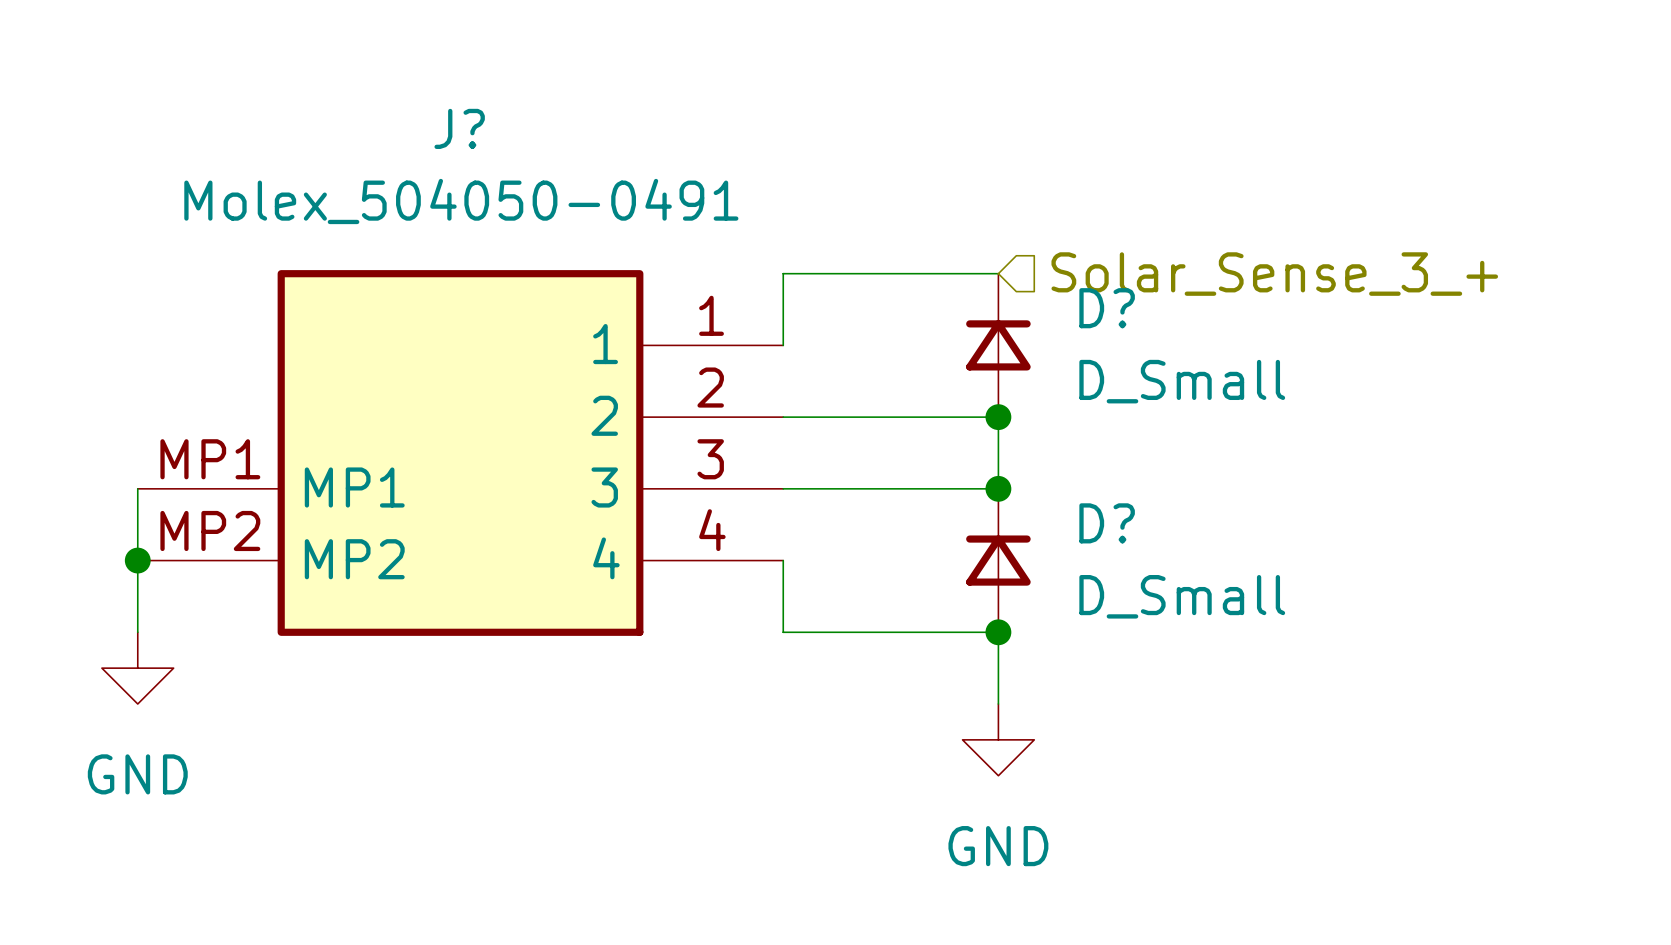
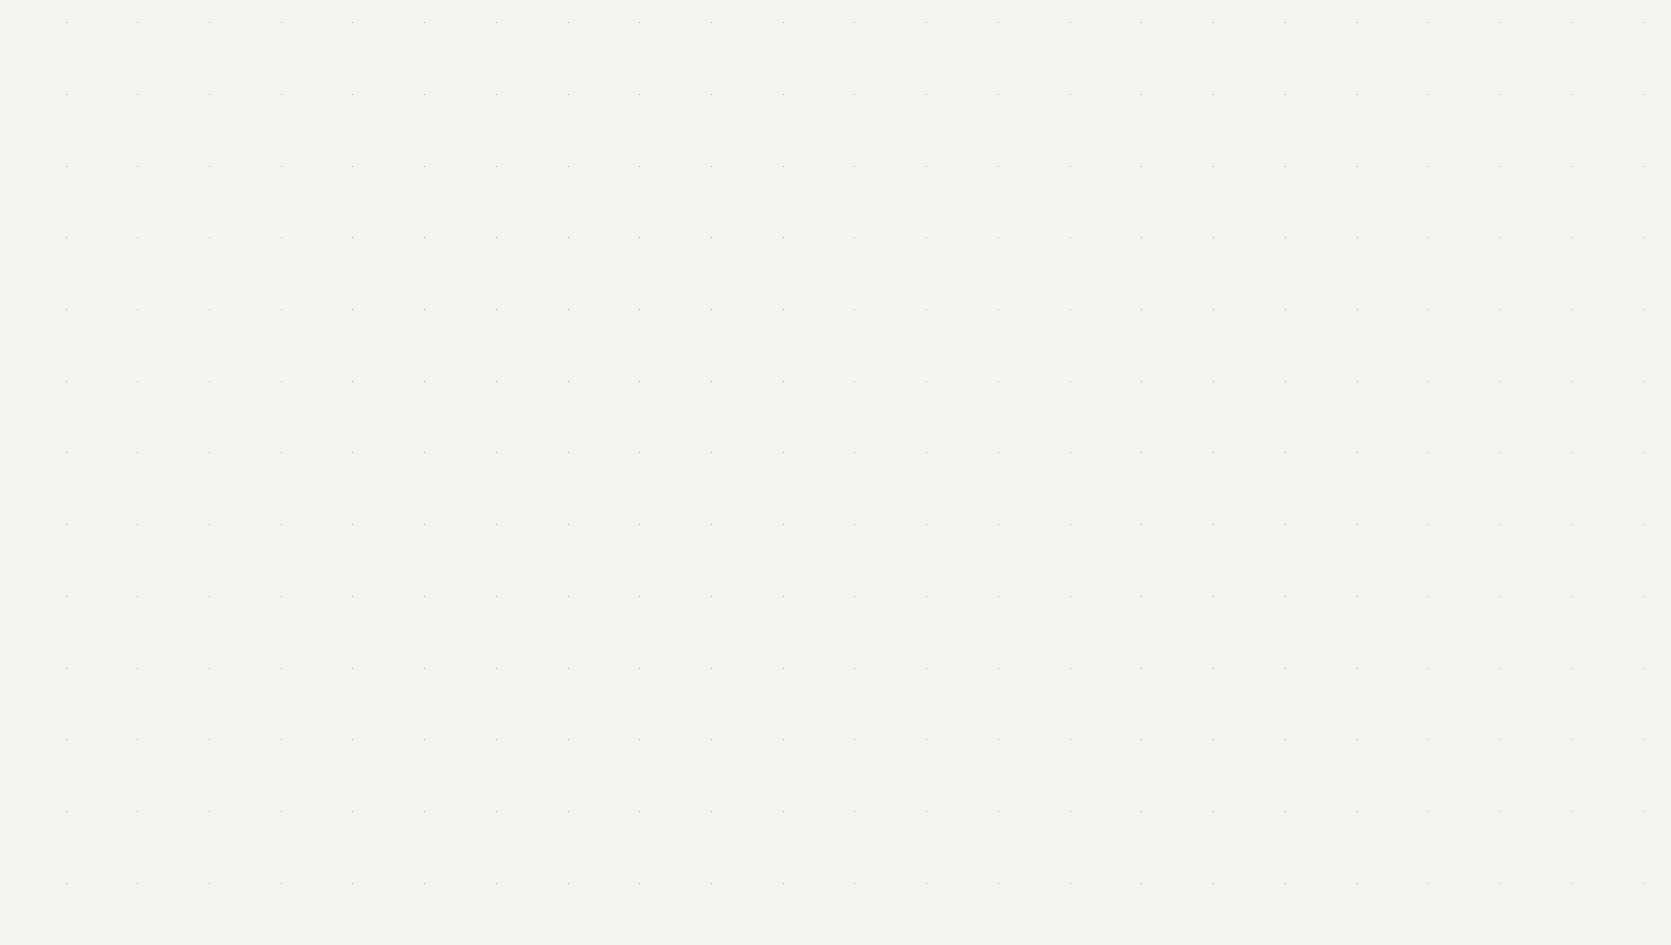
wire: (998, 273) (783, 273) (783, 345) -> none
hierarchical label: Solar_Sense_3_+ (1274, 274) -> none
D?: D_Small (998, 345) -> none
wire: (783, 417) (998, 417) (998, 488) (783, 488) -> none
junction: (998, 417) -> none
J?: Molex_504050-0491 (460, 452) -> none
wire: (137, 488) (137, 632) -> none
junction: (998, 488) -> none
junction: (137, 560) -> none
wire: (783, 560) (783, 632) (998, 632) (998, 704) -> none
D?: D_Small (998, 560) -> none
junction: (998, 632) -> none
power symbol: GND (137, 668) -> none
power symbol: GND (998, 739) -> none

